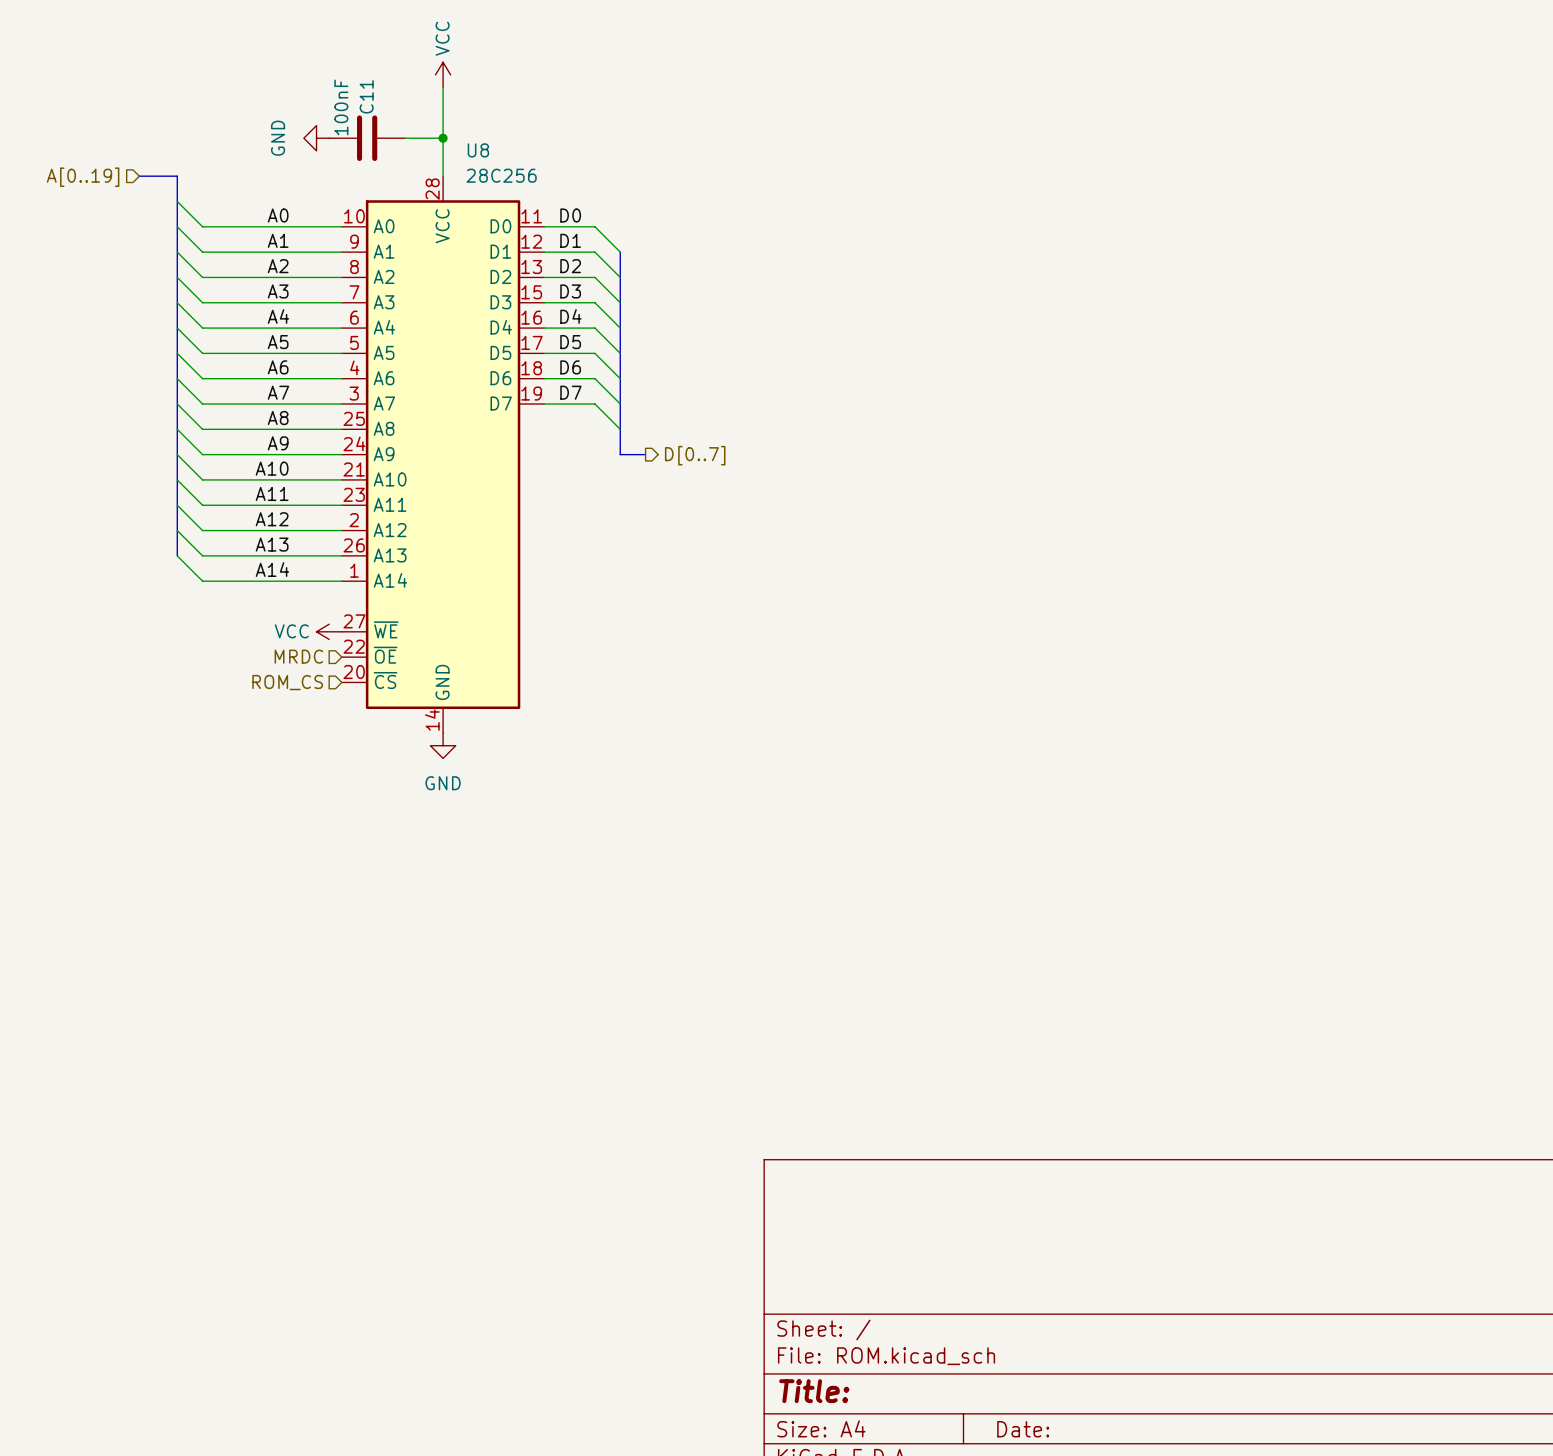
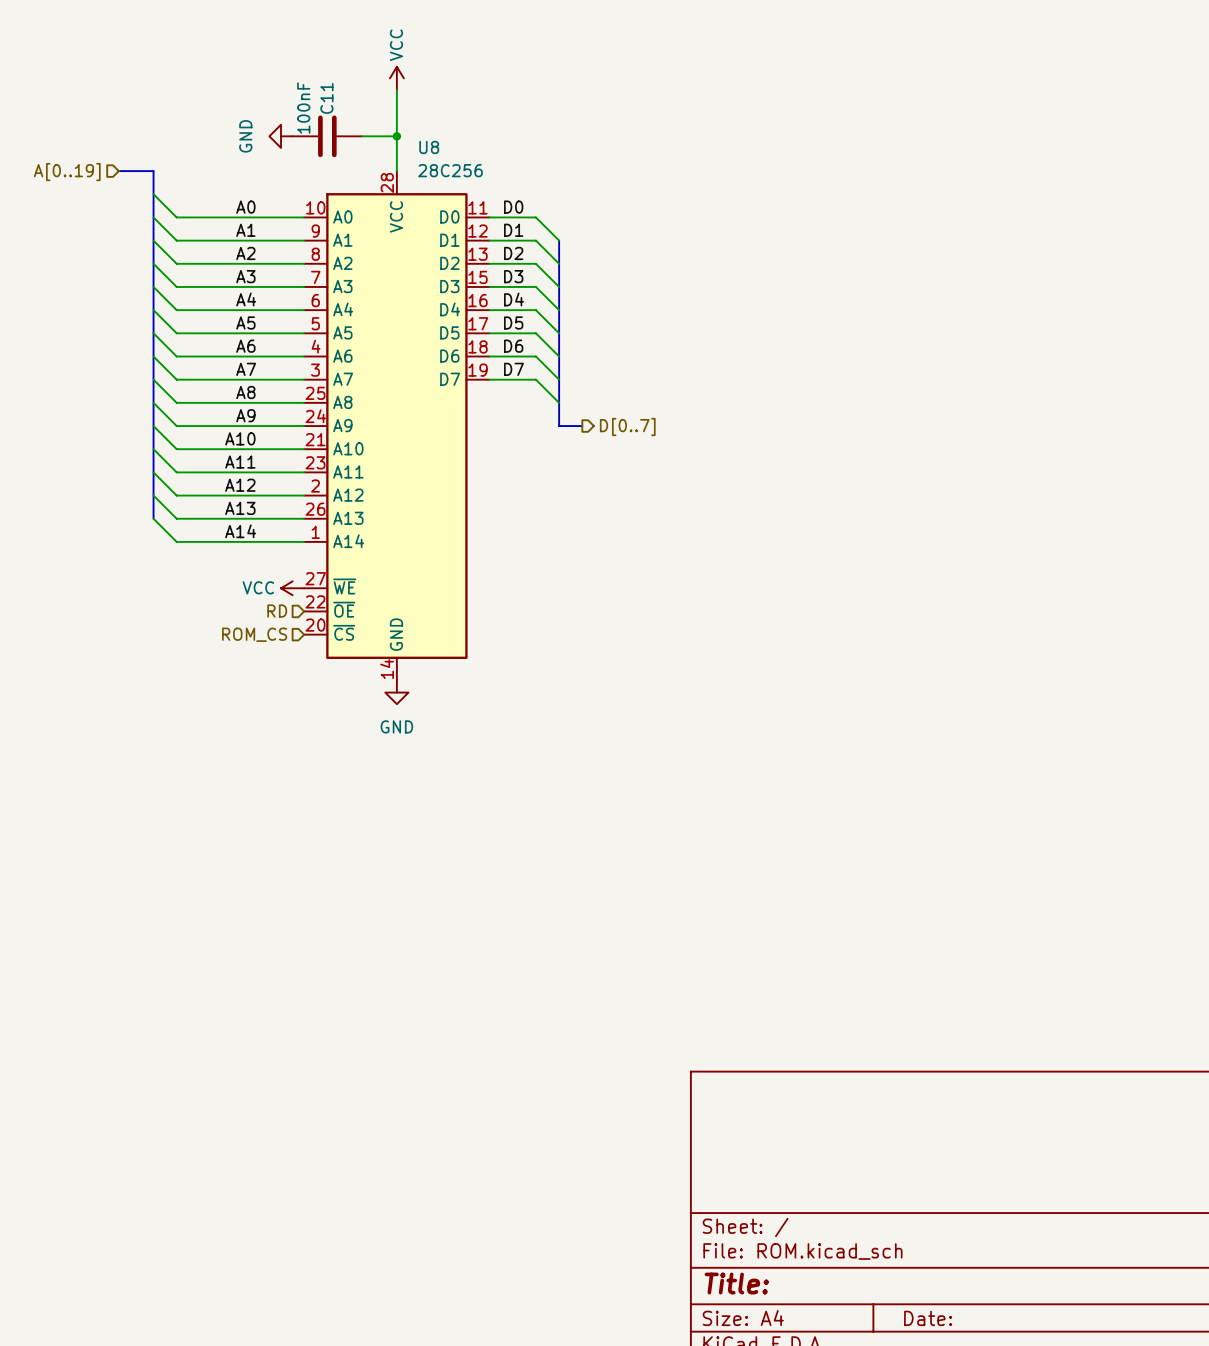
hierarchical label: MRDC (298, 656) -> RD (277, 611)

